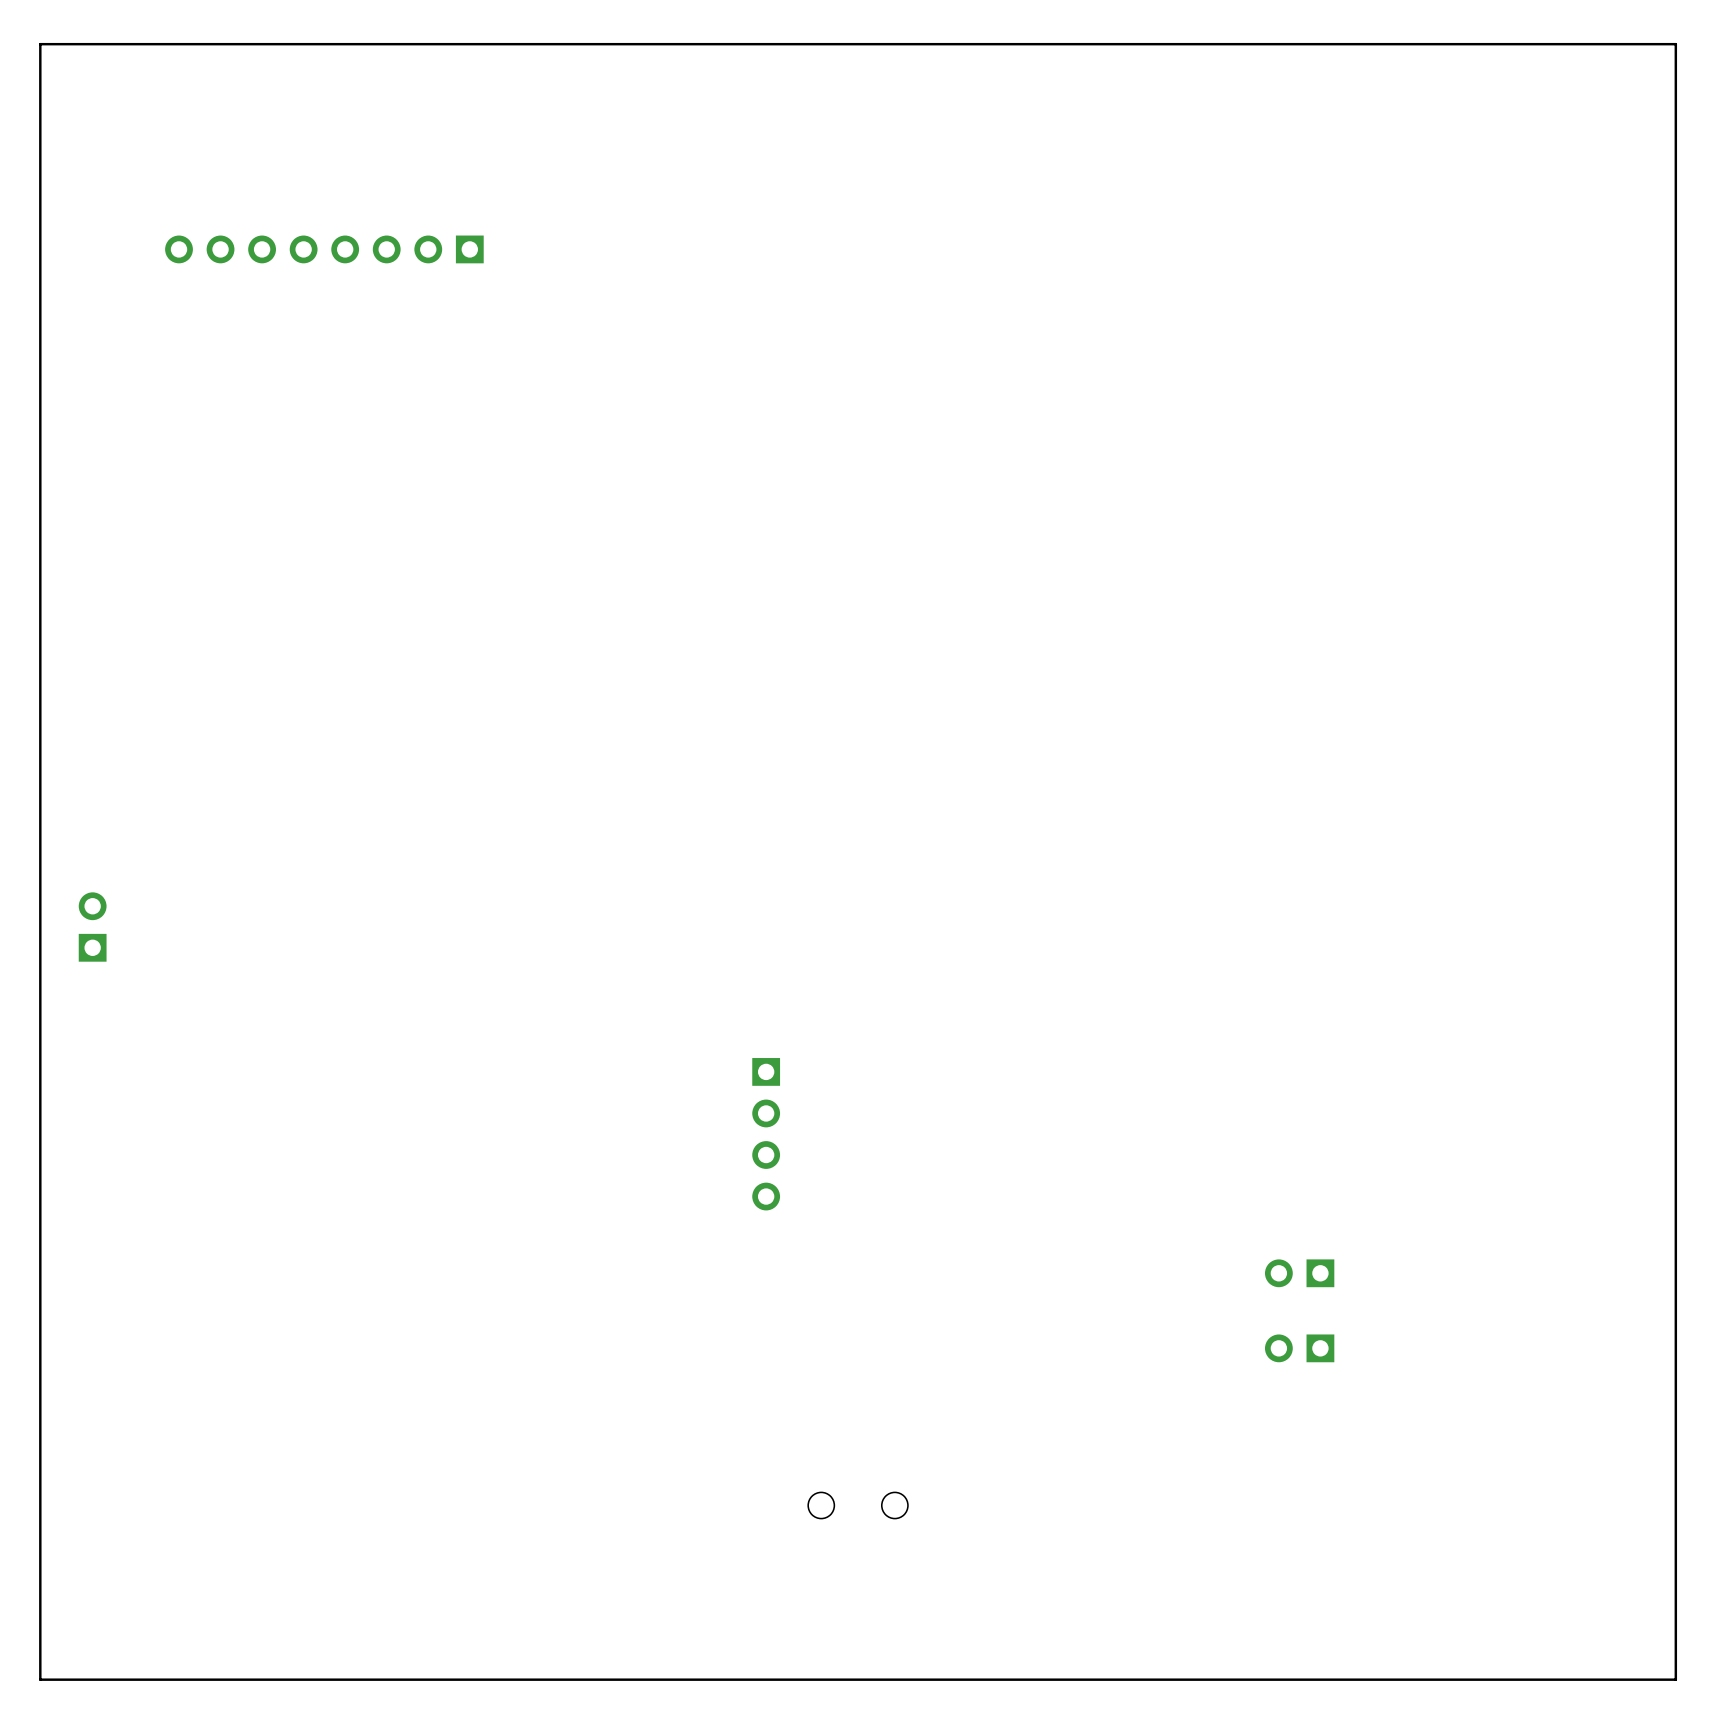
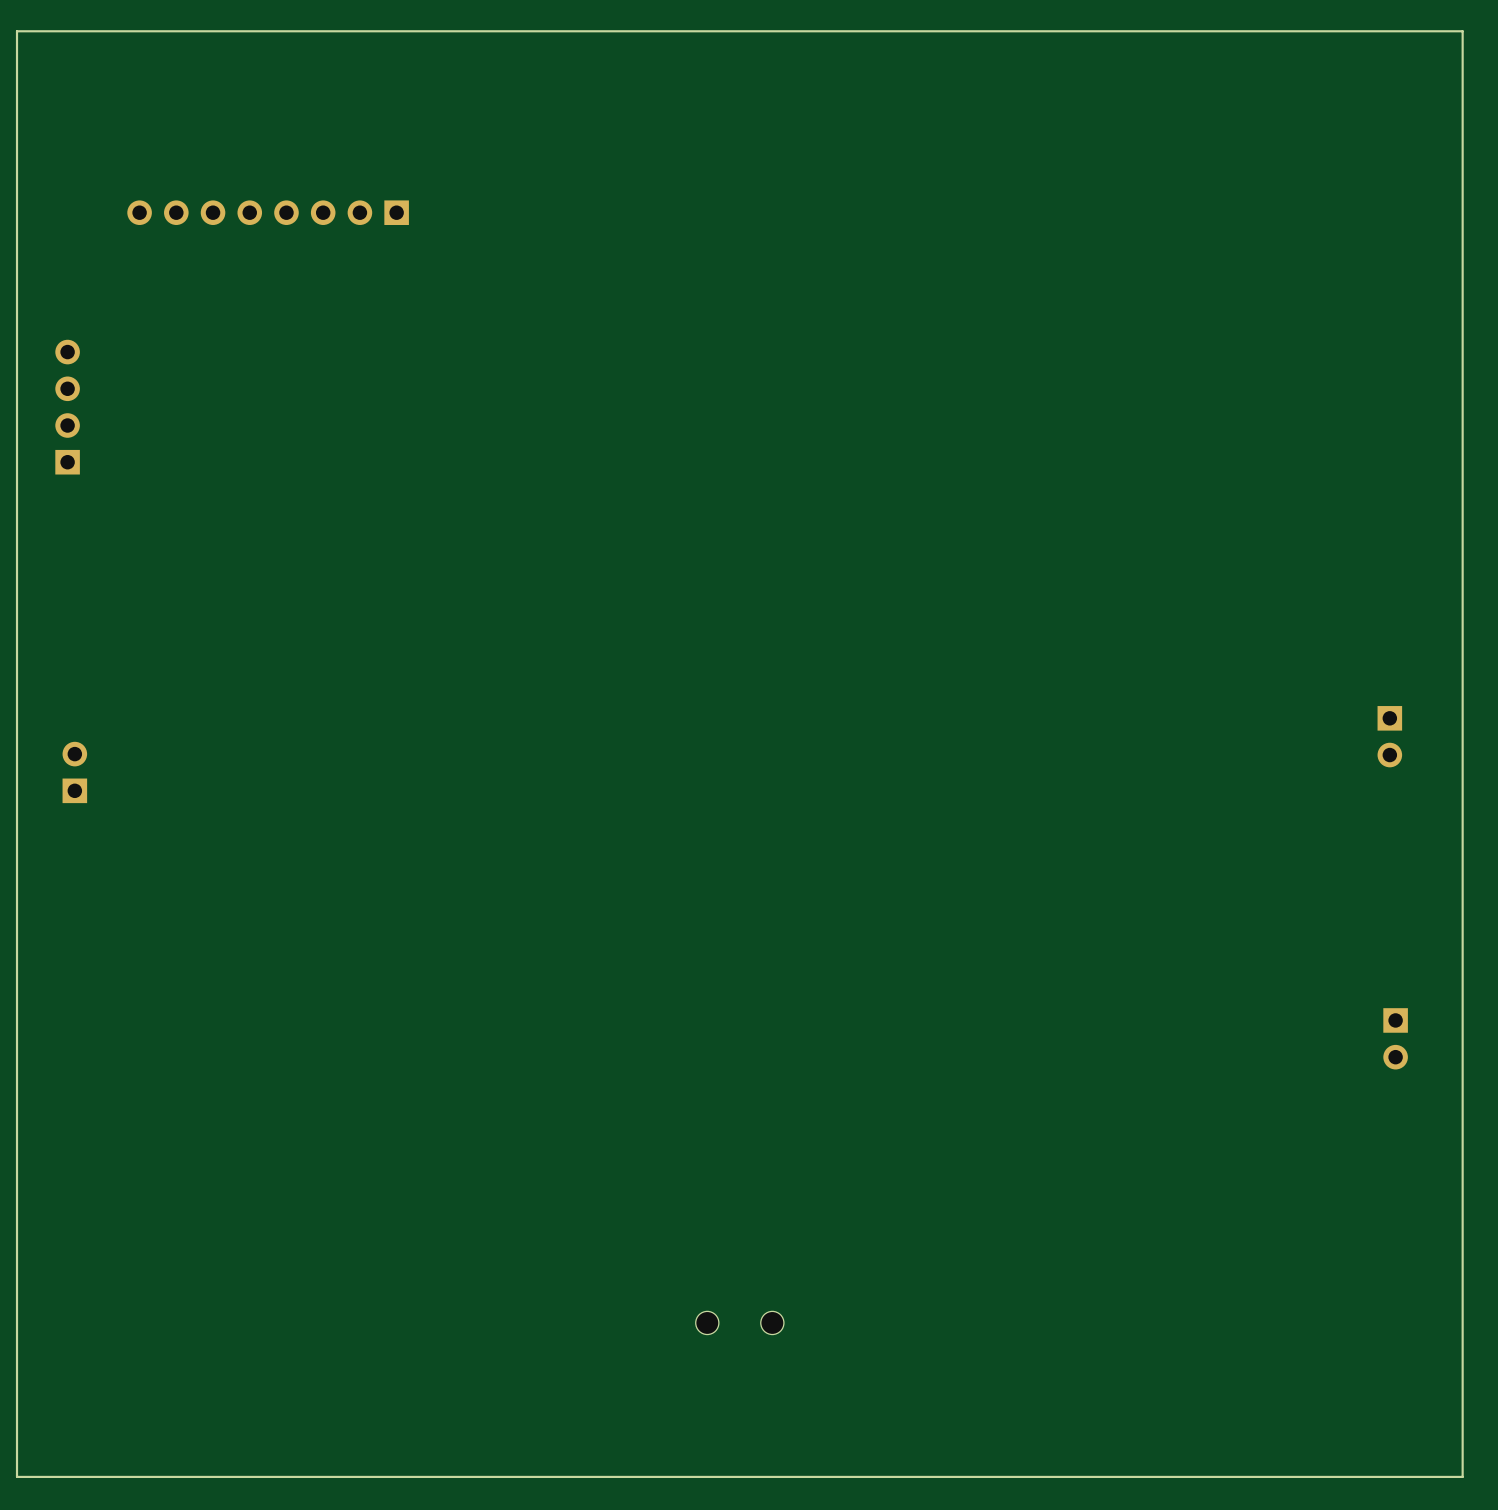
part: none -> (67, 407)
part: none -> (1389, 736)
part position: (92, 927) -> (74, 772)
part: (766, 1134) -> none
part: none -> (1395, 1038)
part: (1299, 1273) -> none
part: (1299, 1348) -> none

